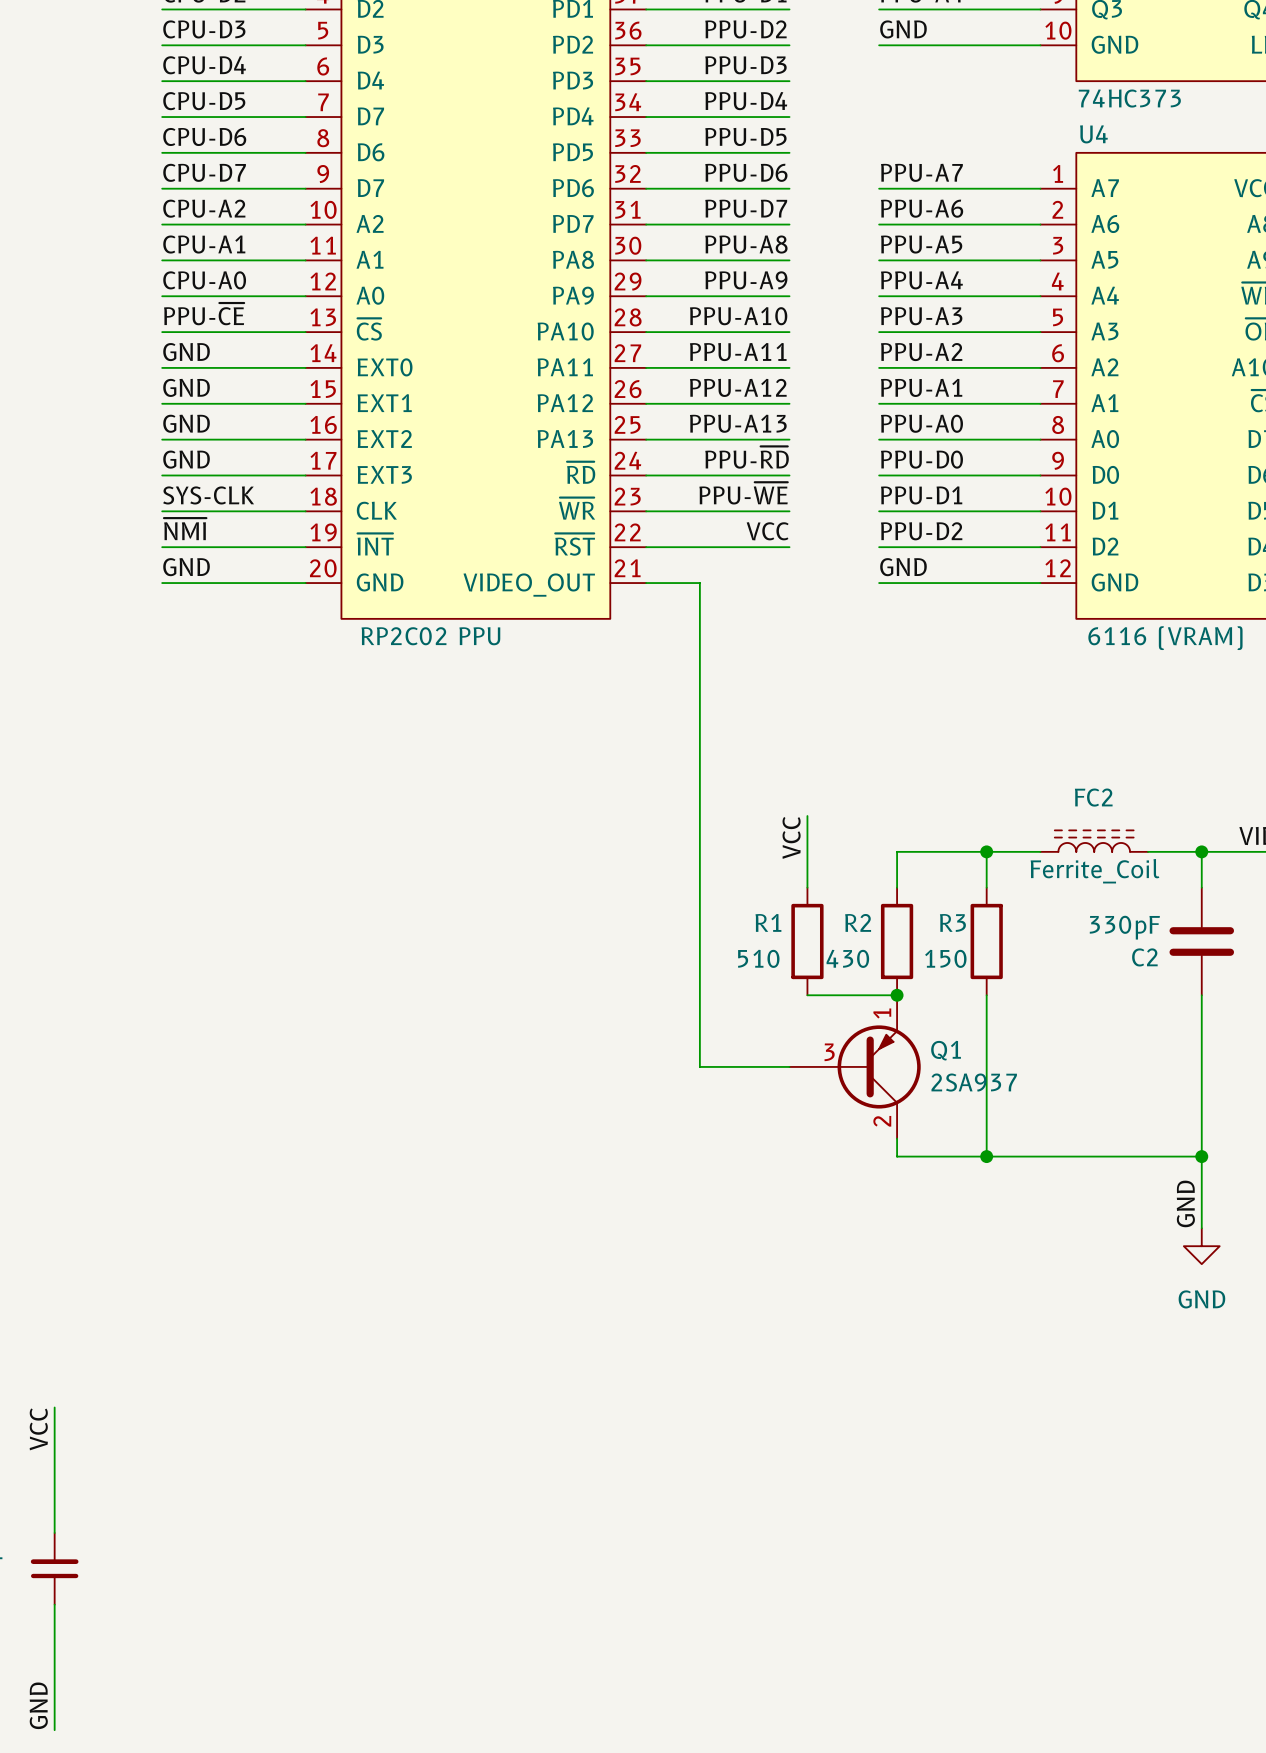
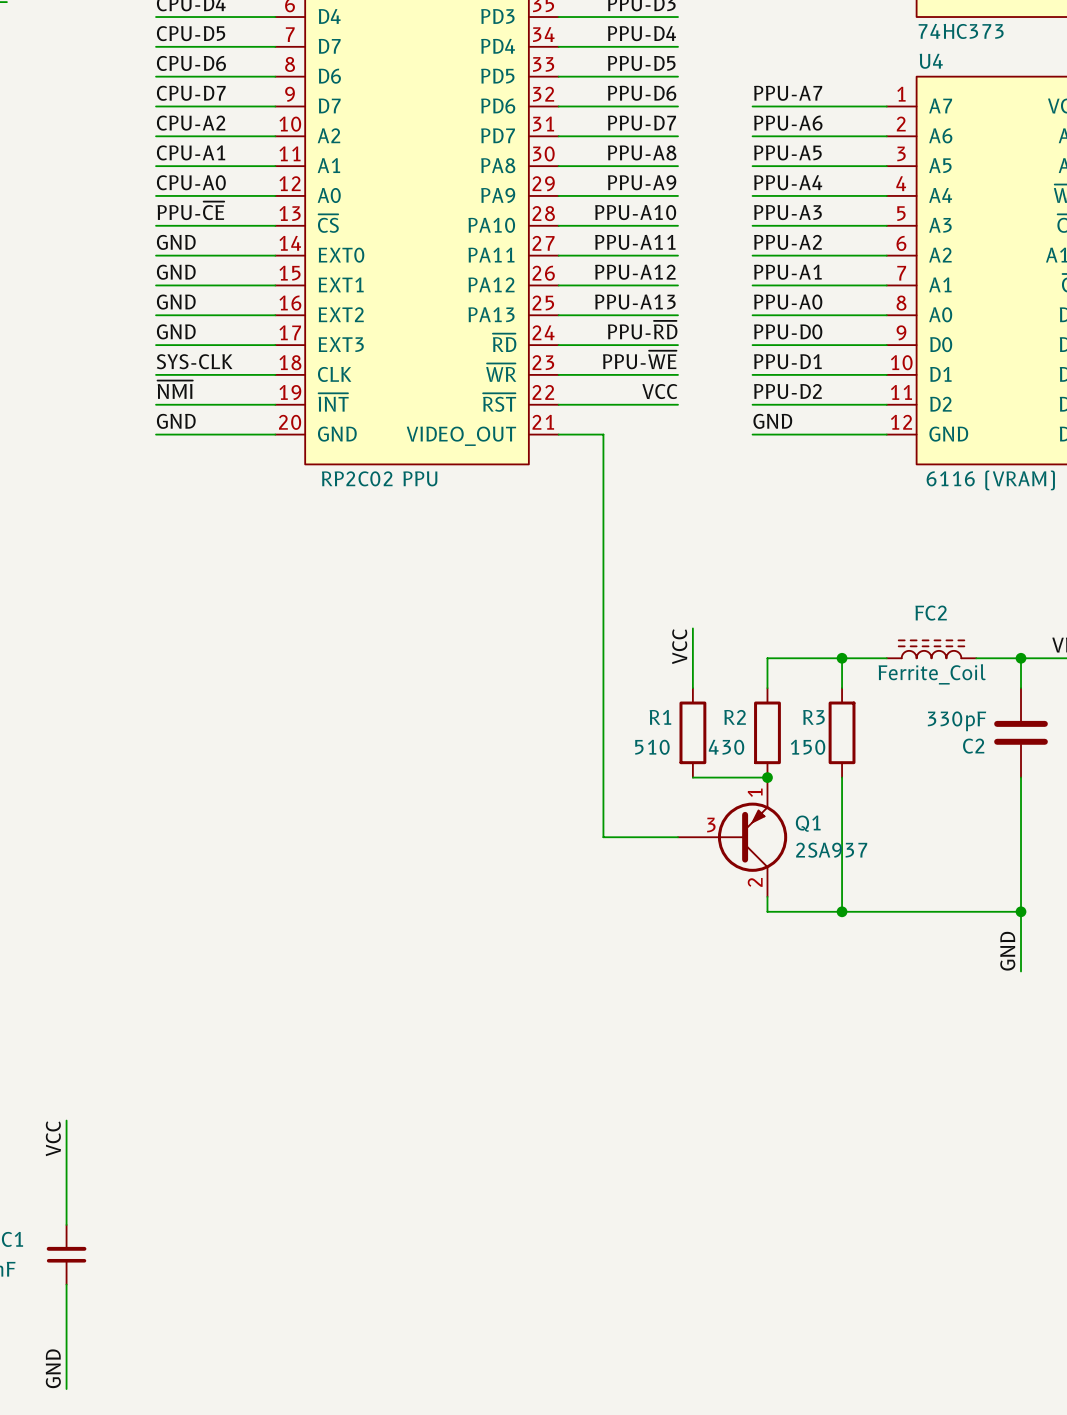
power symbol: GND (1201, 1246) -> none

